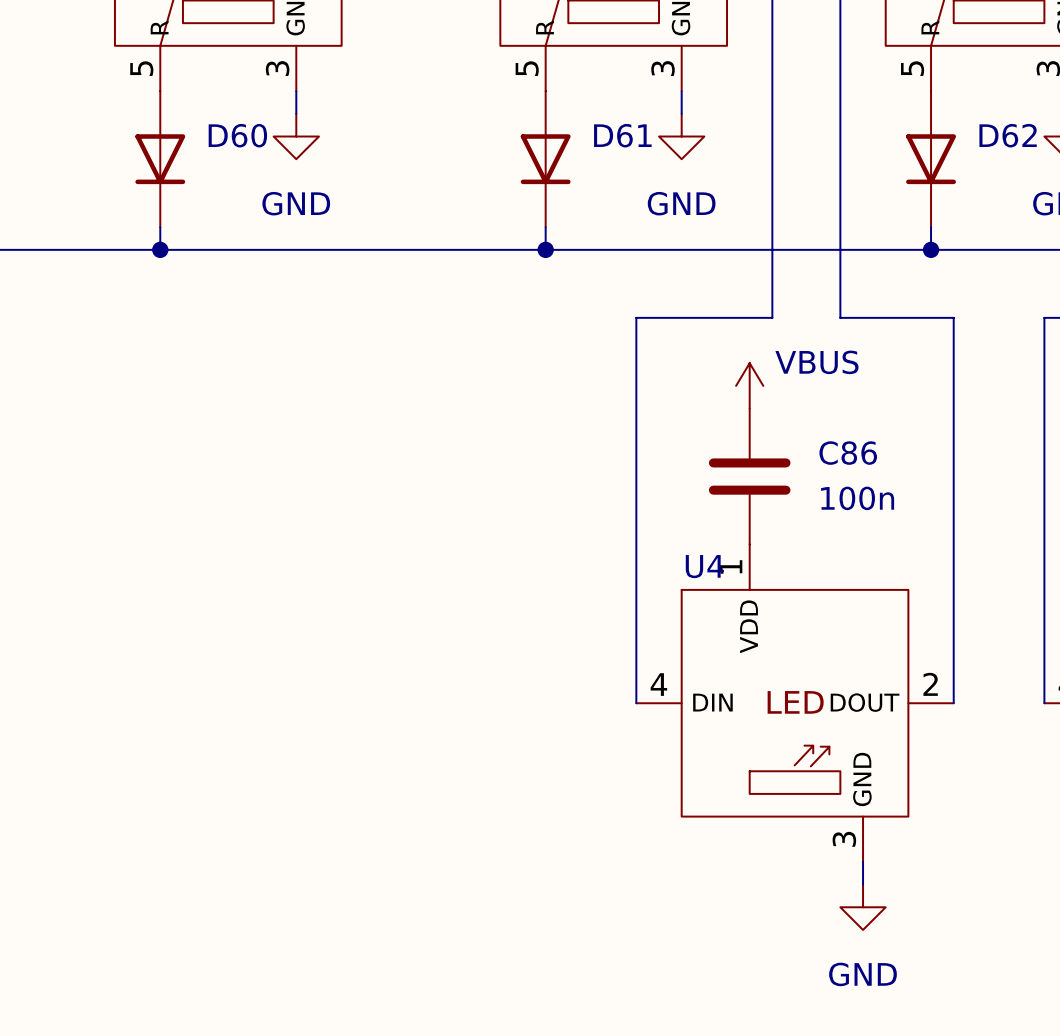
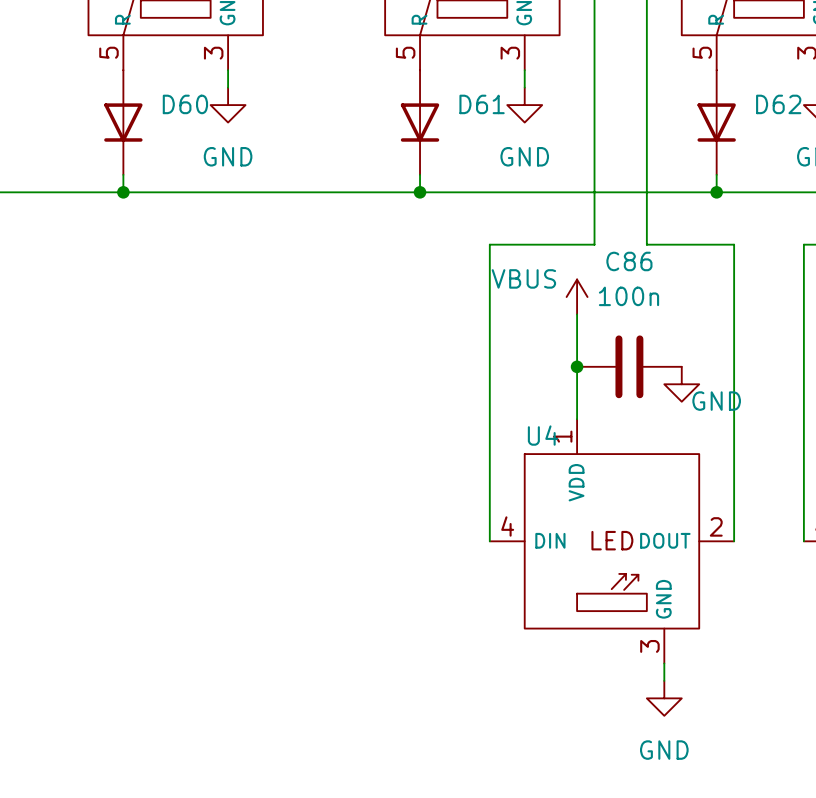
power symbol text position: VBUS (816, 362) -> VBUS (523, 278)
C86 name position: C86 (848, 453) -> C86 (629, 261)
C86 rotation: 0° (749, 476) -> 90° clockwise (629, 366)
junction: none -> (577, 366)
C86 value position: 100n (857, 498) -> 100n (629, 296)
power symbol: none -> GND (681, 384)

